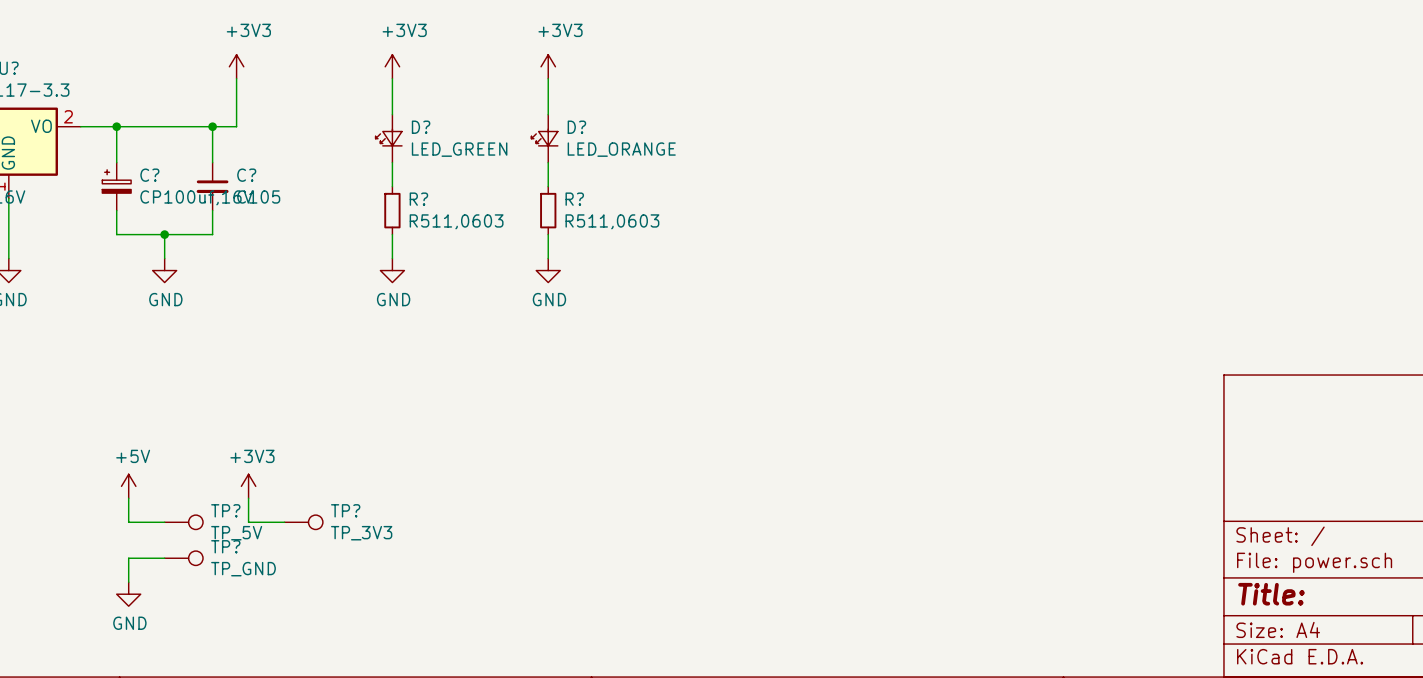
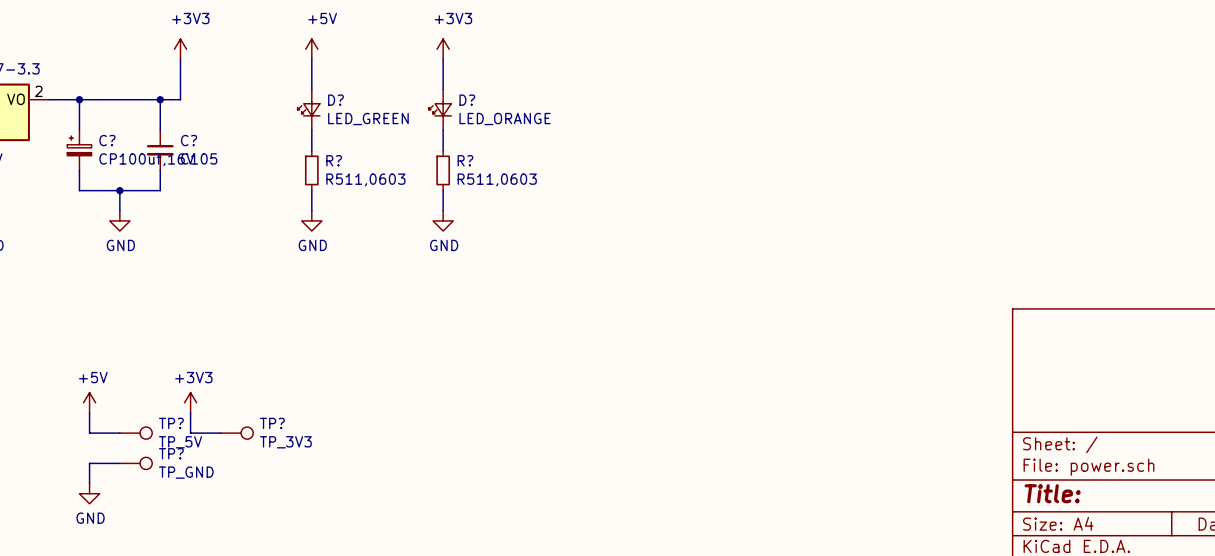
power symbol: +3V3 (392, 66) -> +5V (311, 49)

